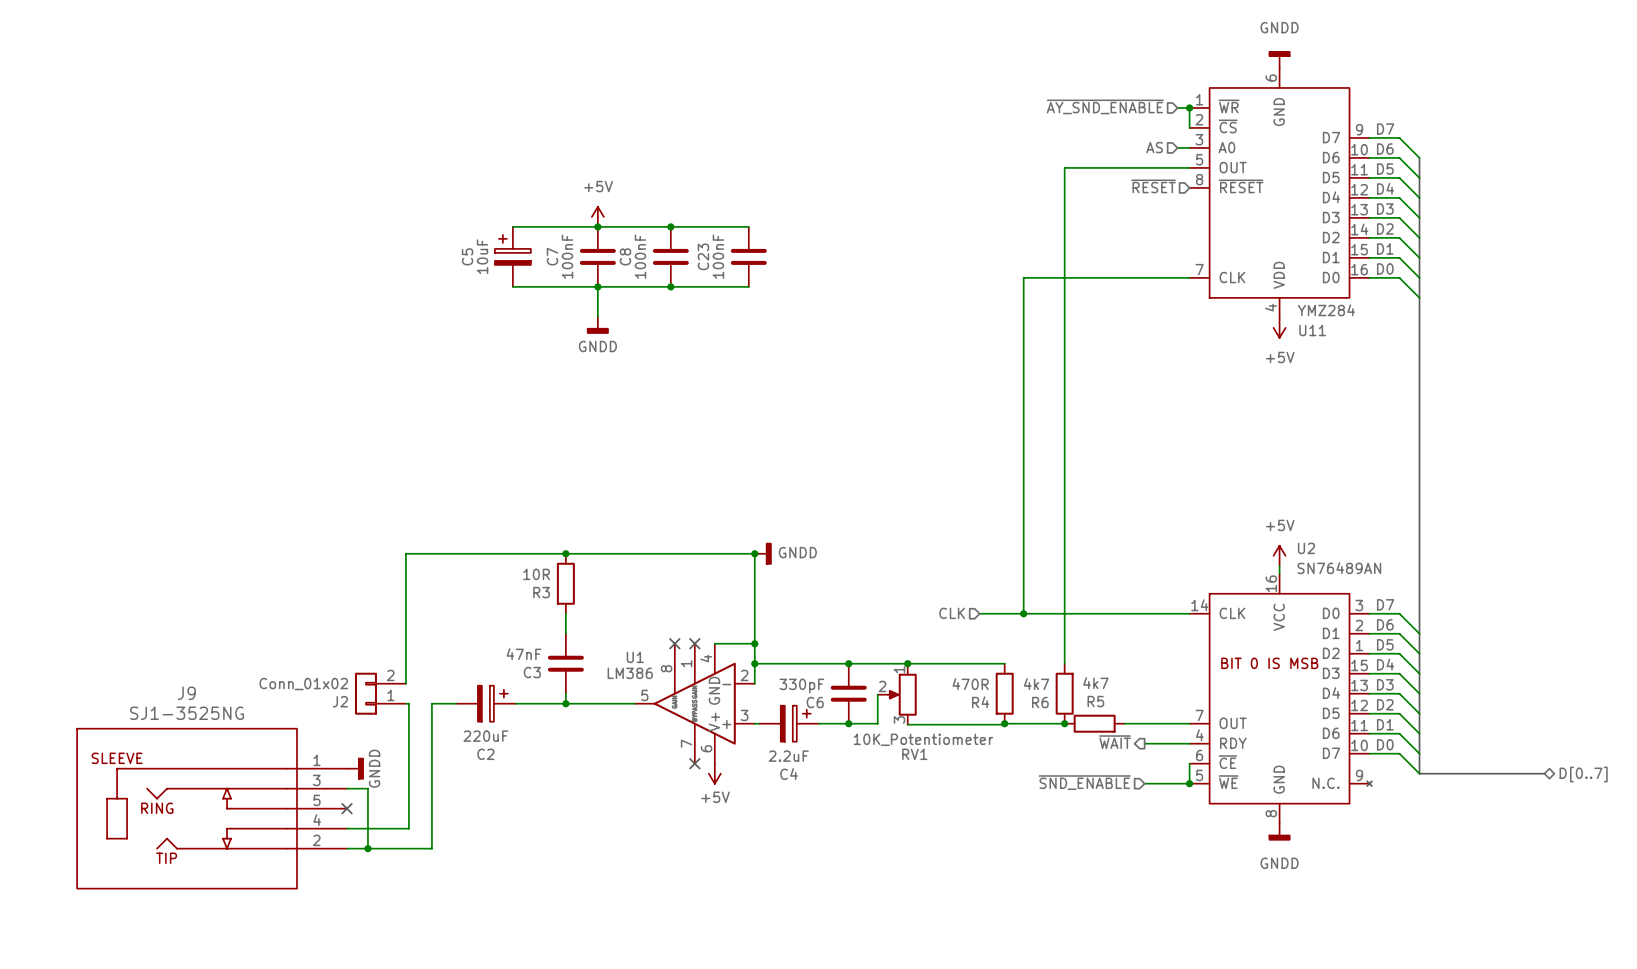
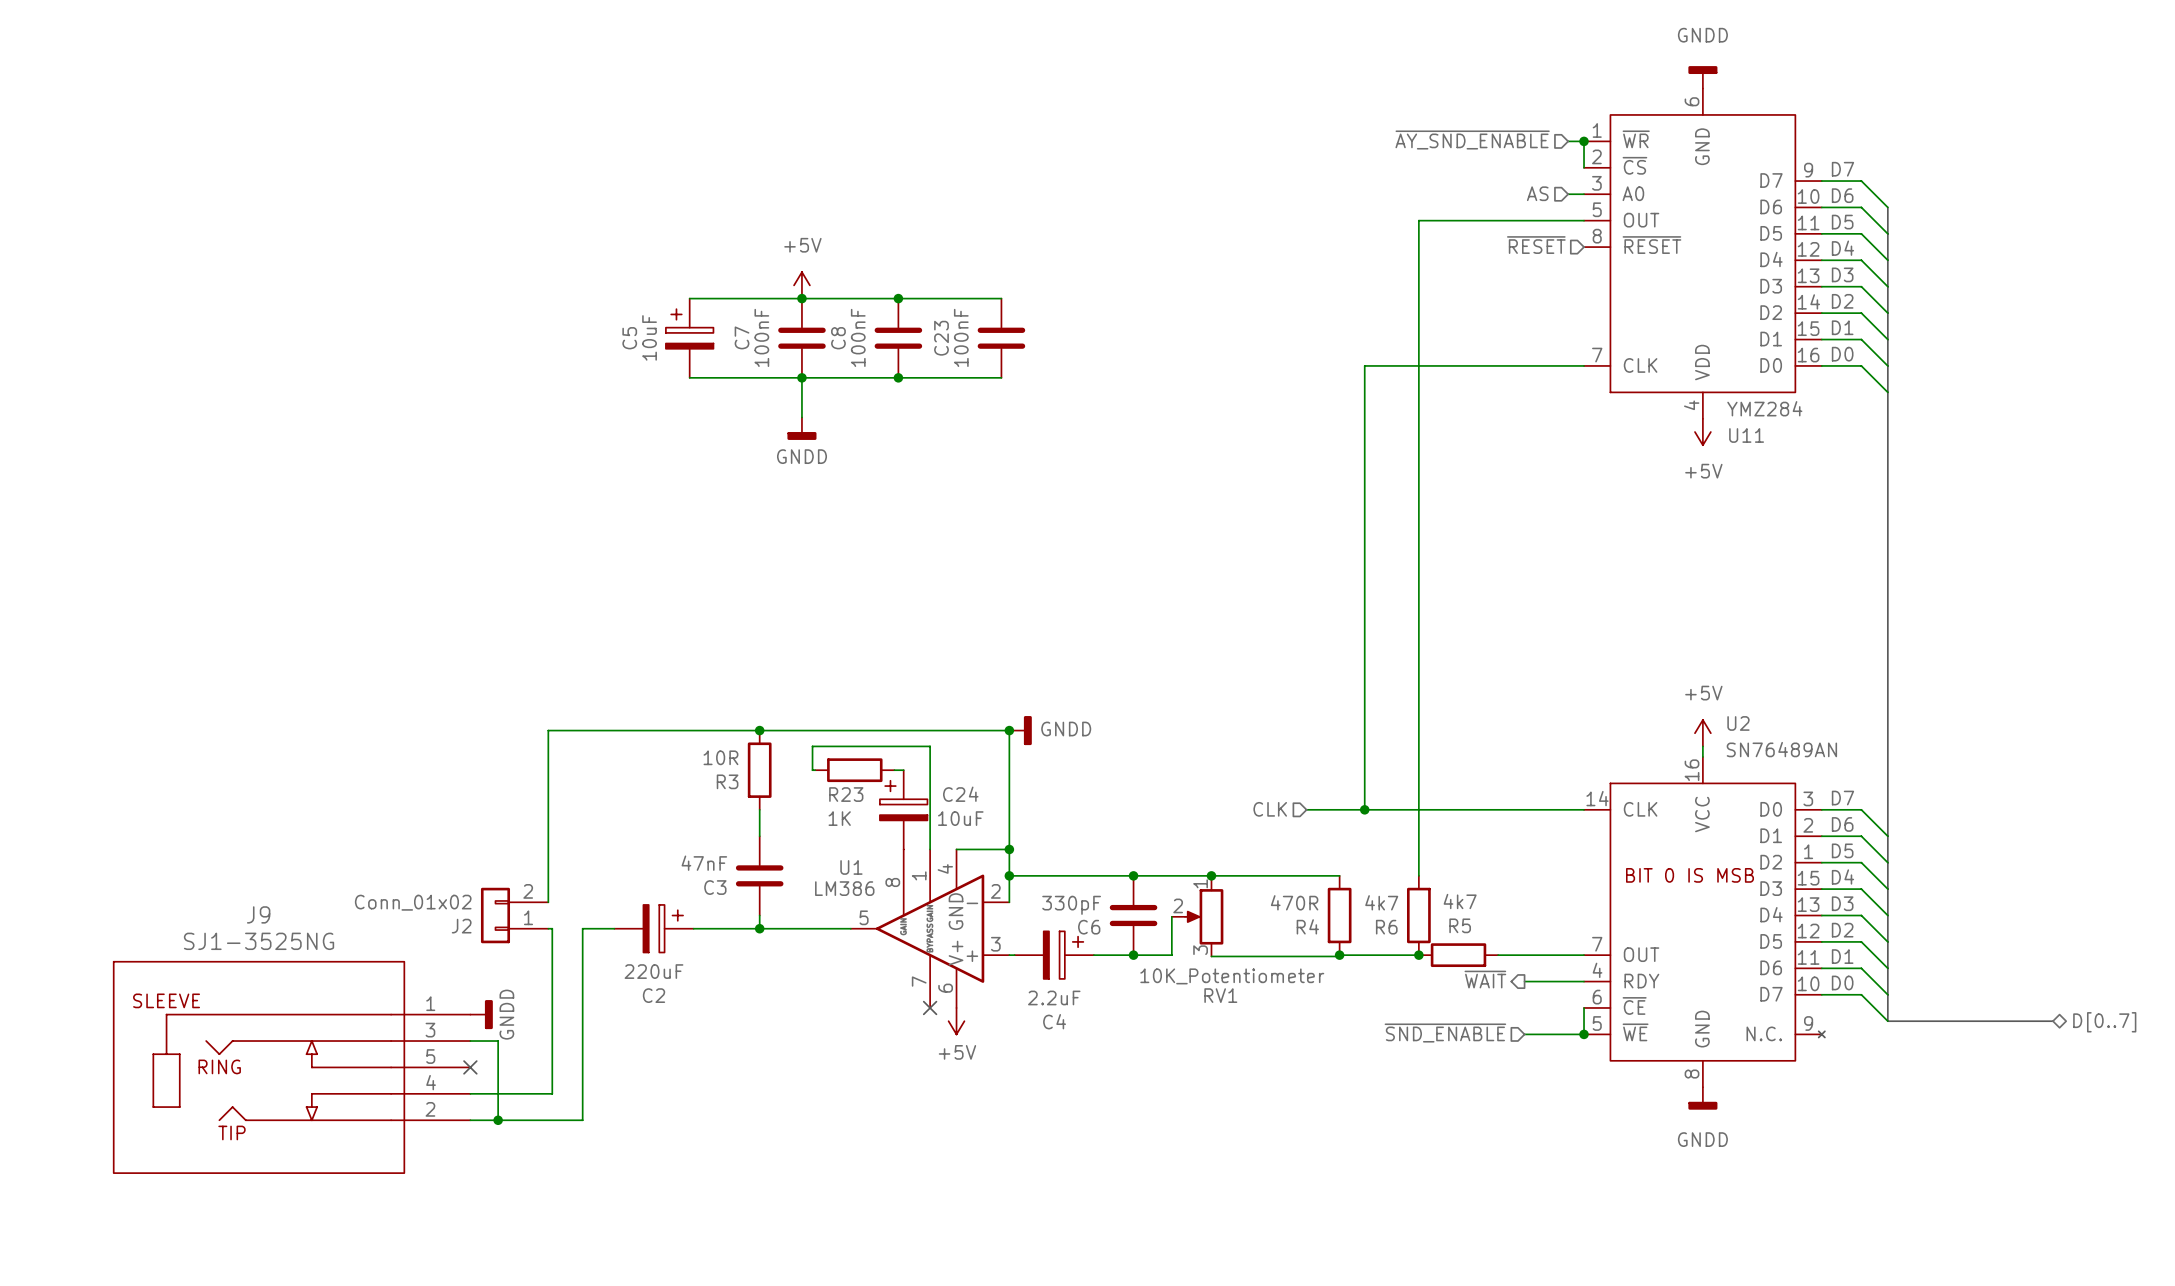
wire: none -> (815, 770) (812, 770) (812, 746) (930, 746) (930, 849)
R23: none -> 1K (854, 770)
wire: none -> (894, 770) (903, 770)
C24: none -> 10uF (903, 809)
no-connect mark: (674, 643) -> none
no-connect mark: (694, 643) -> none

